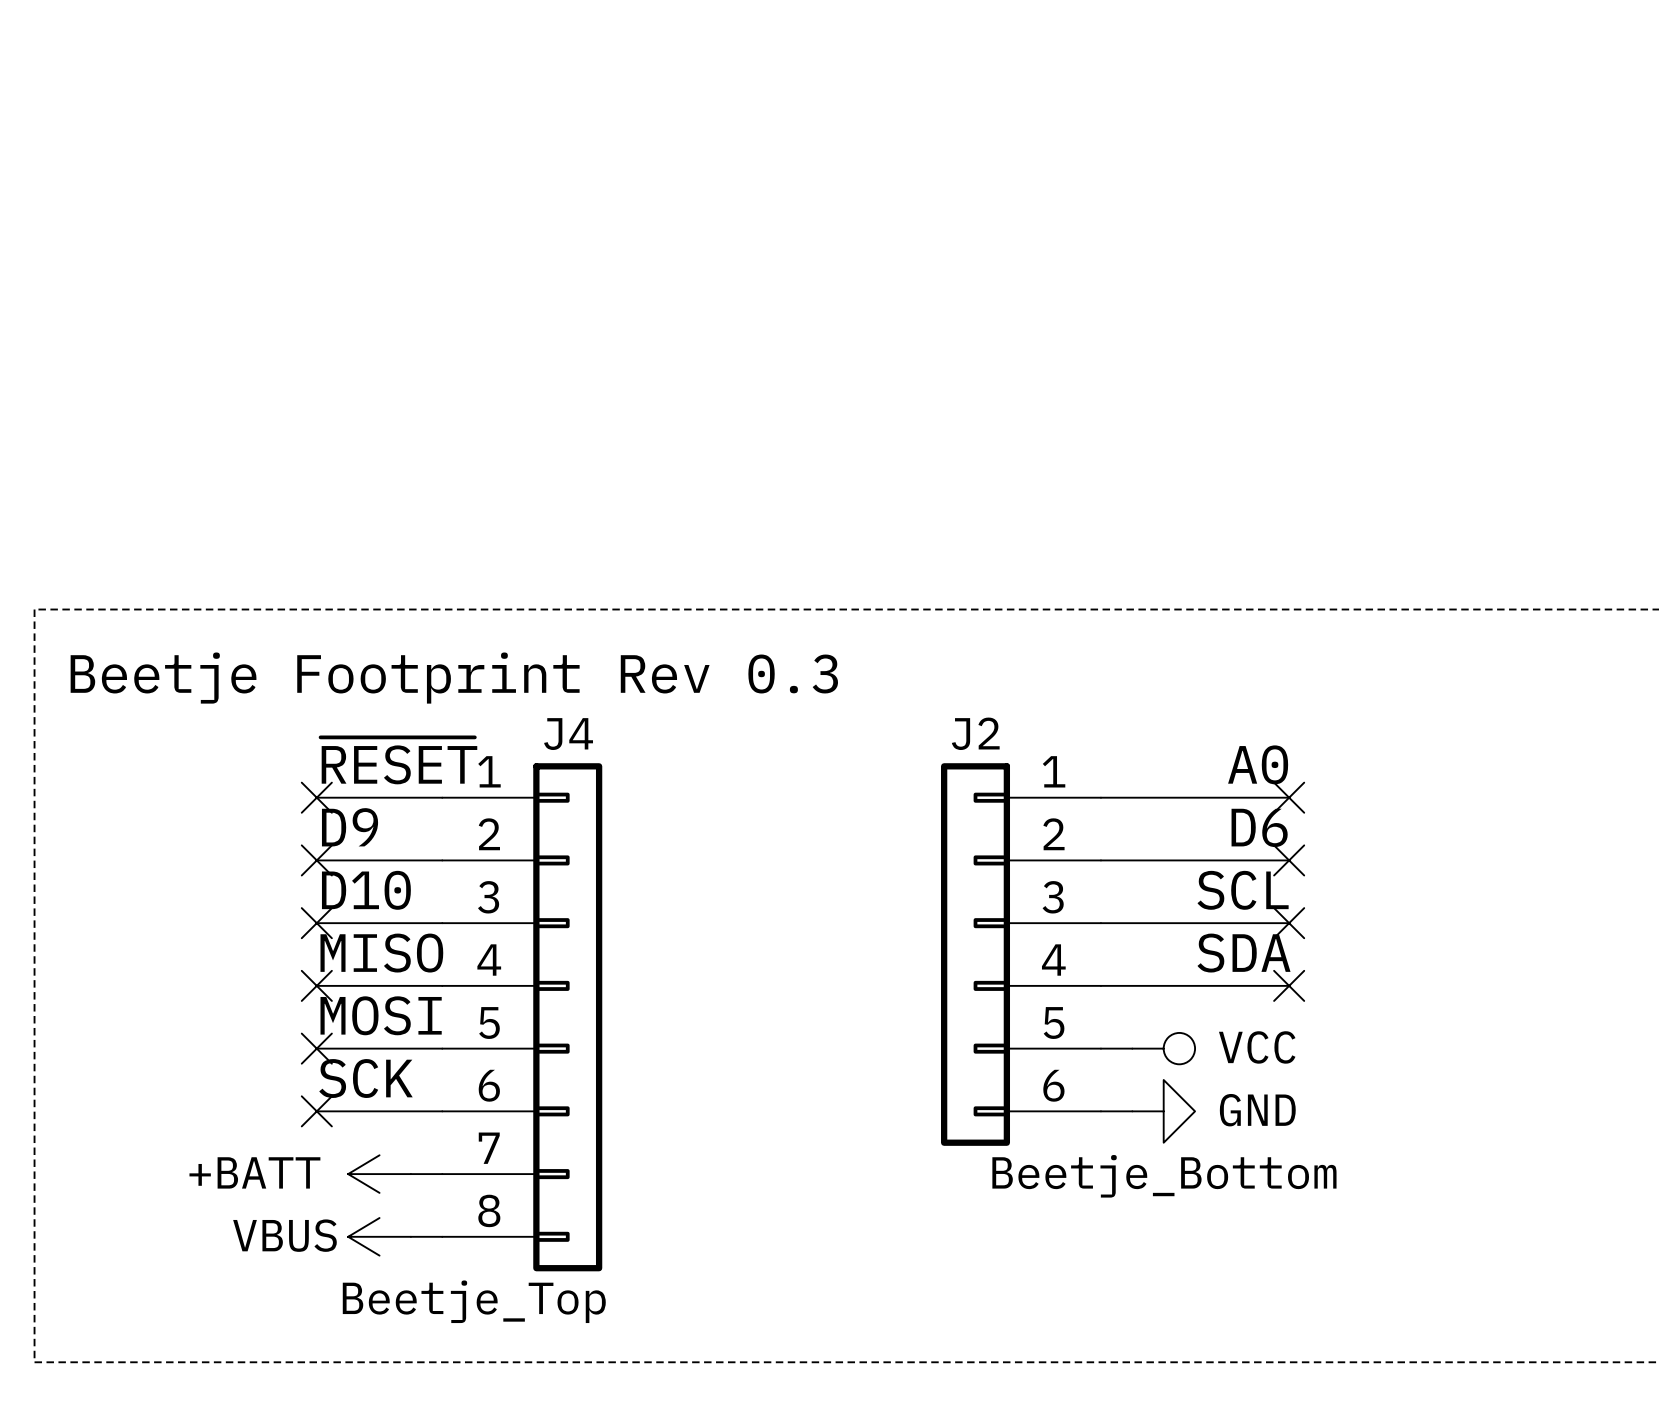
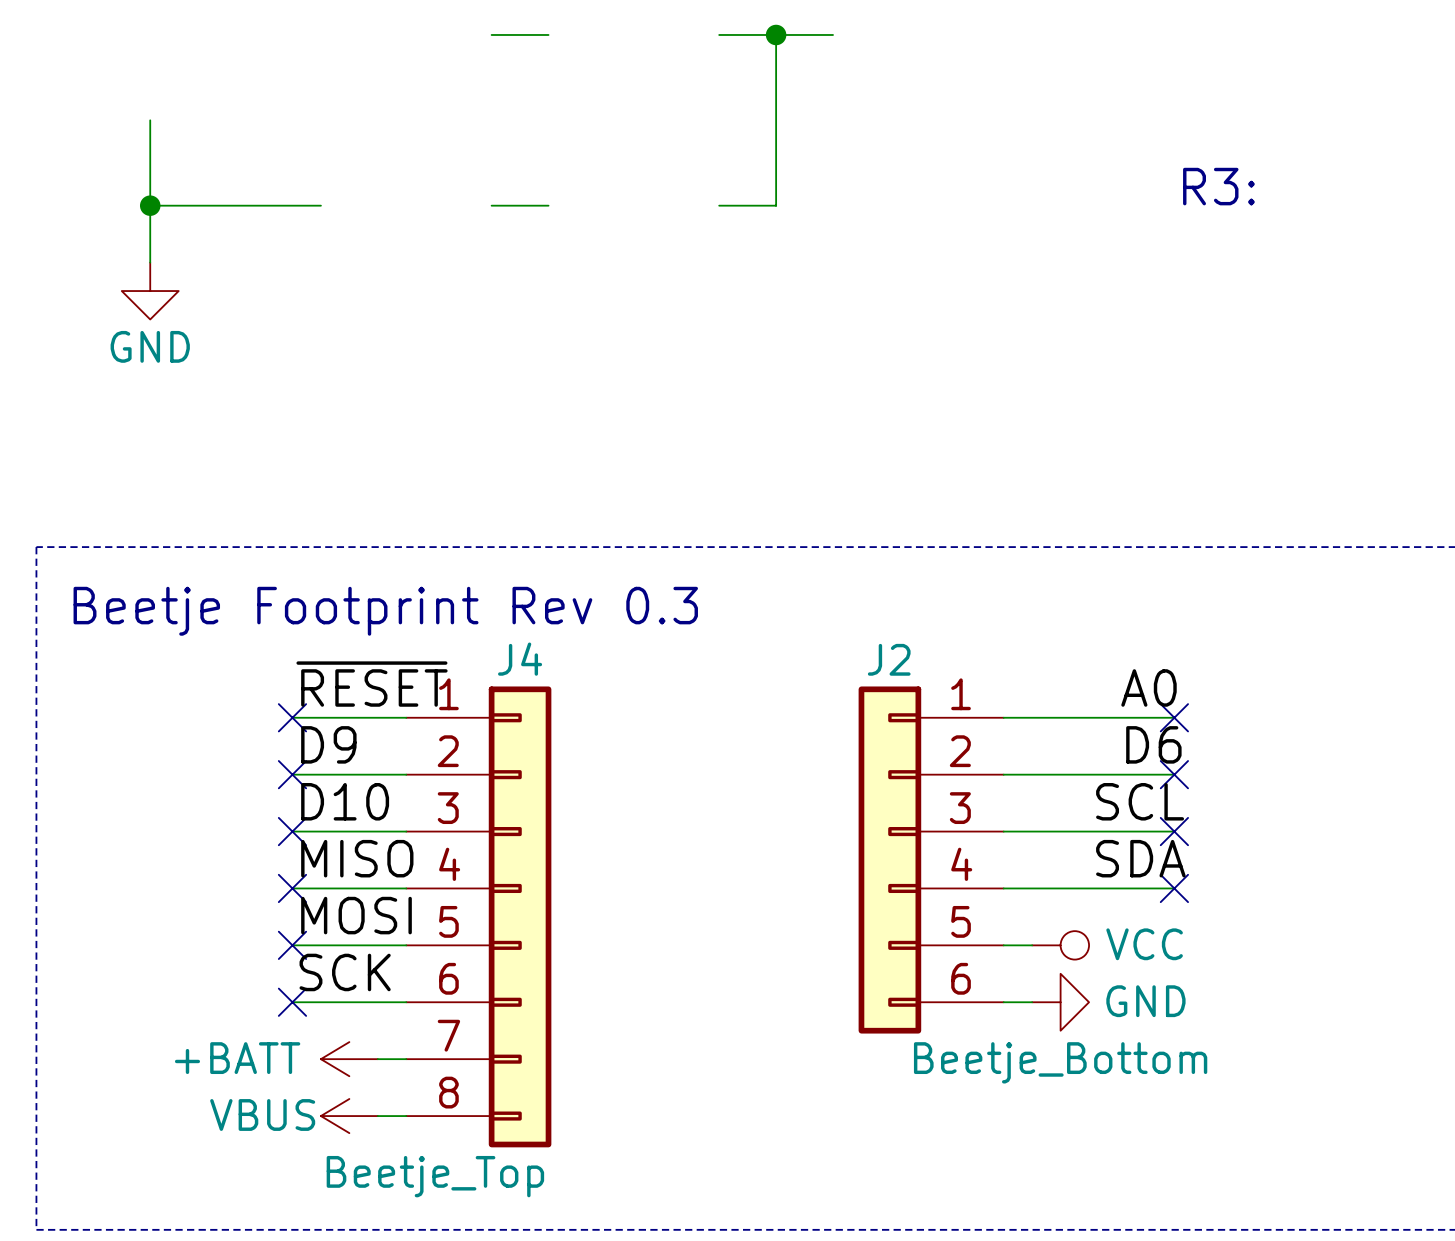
wire: none -> (491, 34) (548, 34)
wire: none -> (719, 34) (833, 34)
wire: none -> (776, 34) (776, 205) (719, 205)
junction: none -> (776, 34)
wire: none -> (150, 120) (150, 262)
text: none -> R3: (1218, 186)
wire: none -> (150, 205) (320, 205)
junction: none -> (150, 205)
wire: none -> (491, 205) (548, 205)
power symbol: none -> GND (150, 291)

